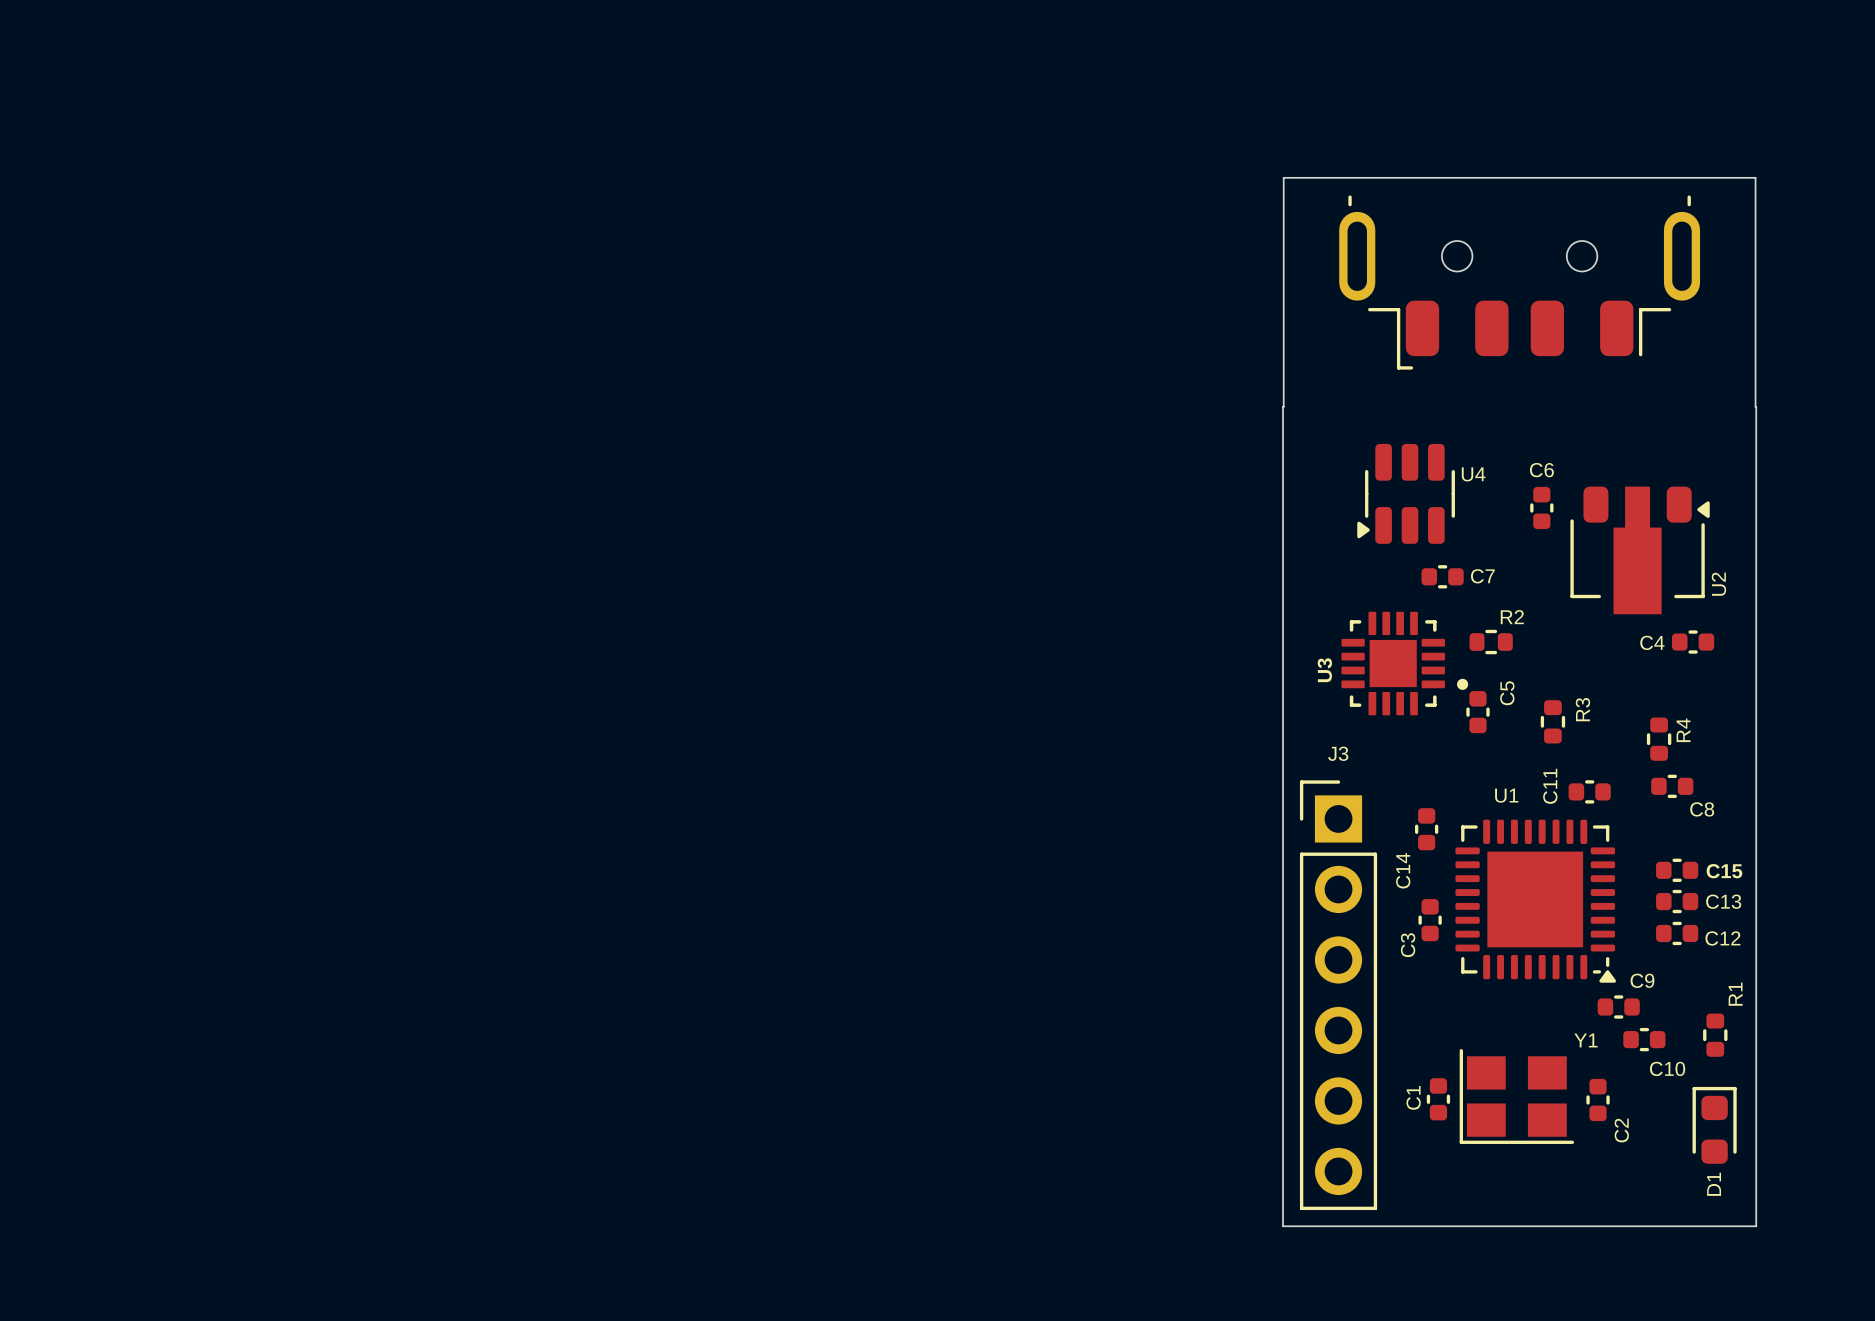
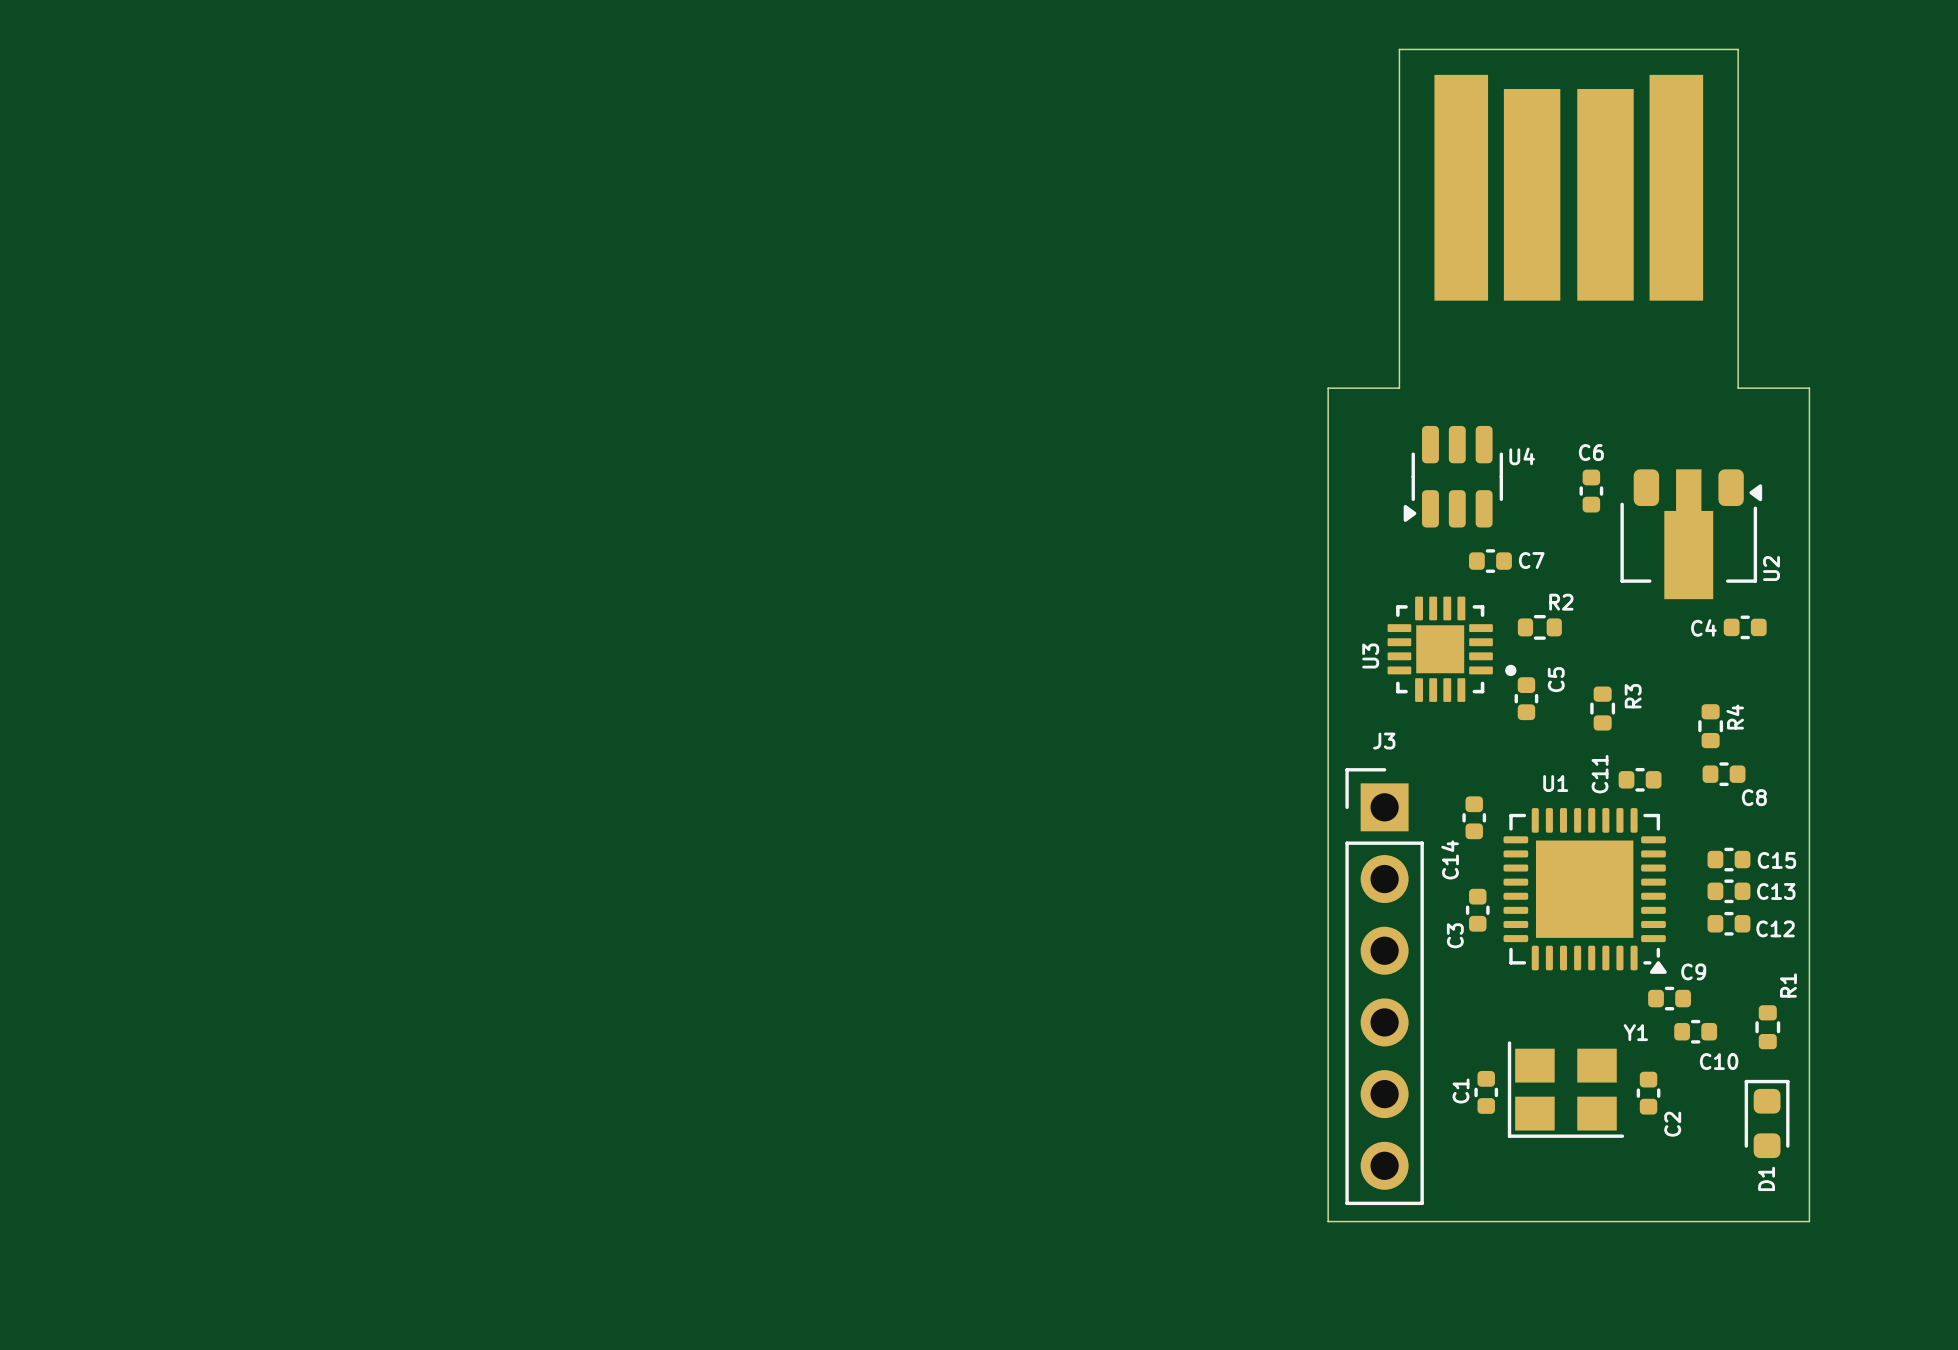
part: none -> (1568, 187)
part: (1519, 282) -> none
board edge: (1283, 406) (1283, 177) (1755, 177) (1755, 406) -> (1328, 388) (1399, 388) (1399, 49) (1738, 49) (1738, 388) (1808, 388)

